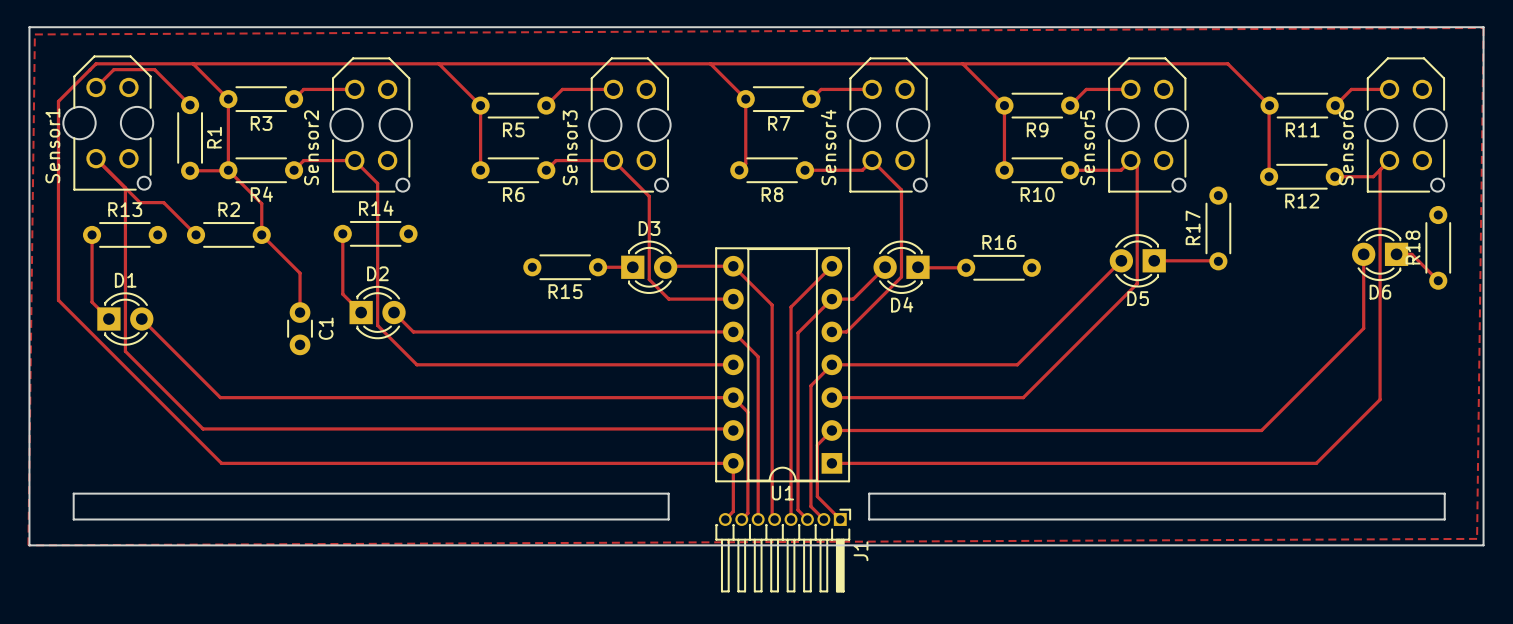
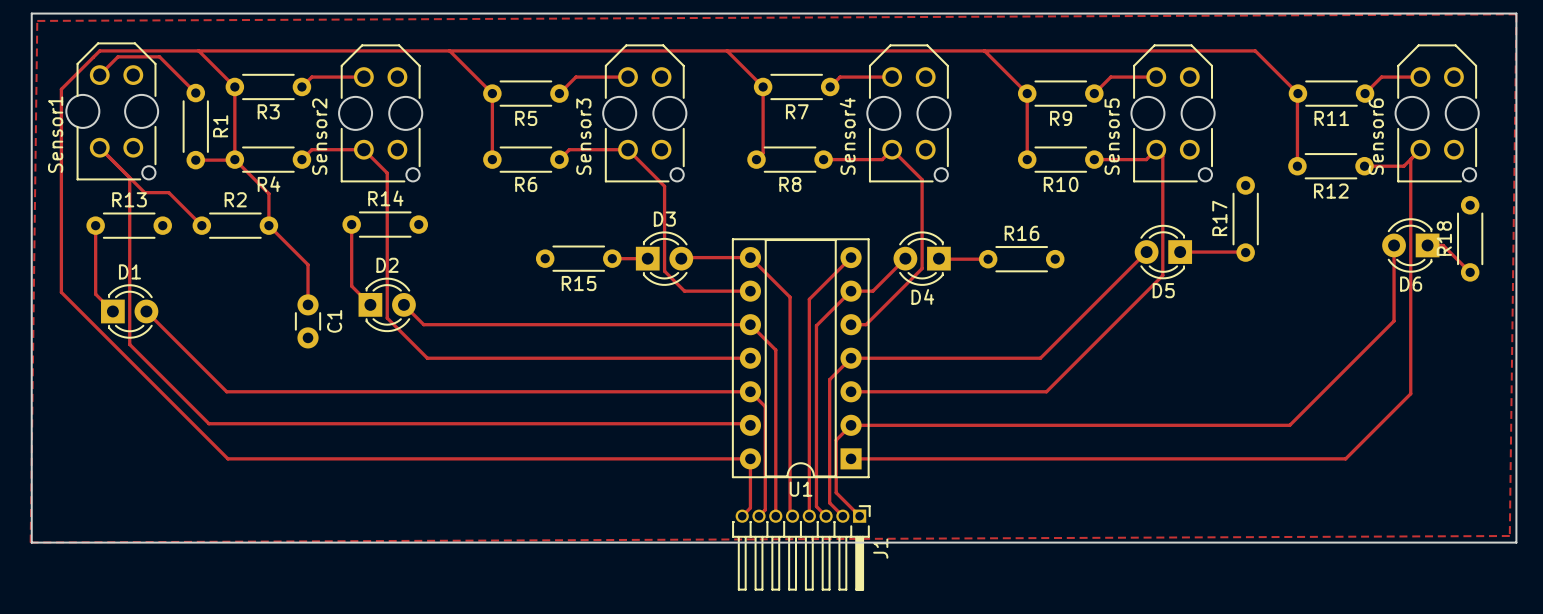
board edge: (73, 493) (668, 493) (668, 519) (73, 519) (73, 493) -> none
board edge: (869, 493) (1444, 493) (1444, 519) (869, 519) (869, 493) -> none

